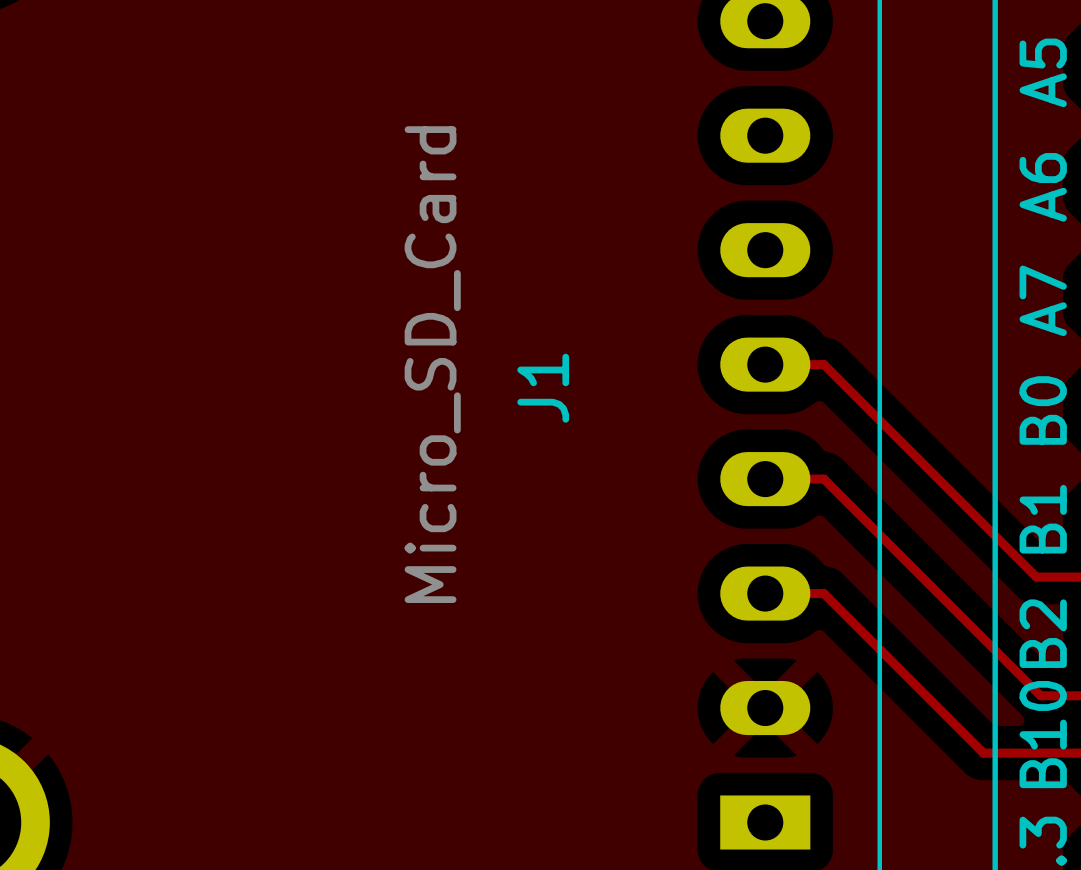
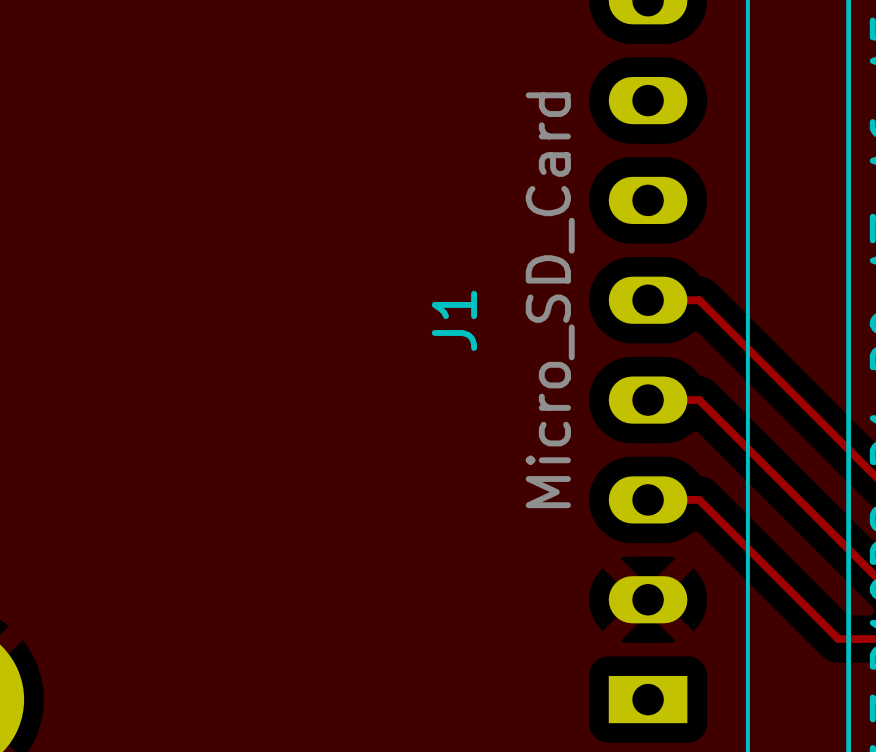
J1 value position: Micro_SD_Card (432, 364) -> Micro_SD_Card (550, 300)

